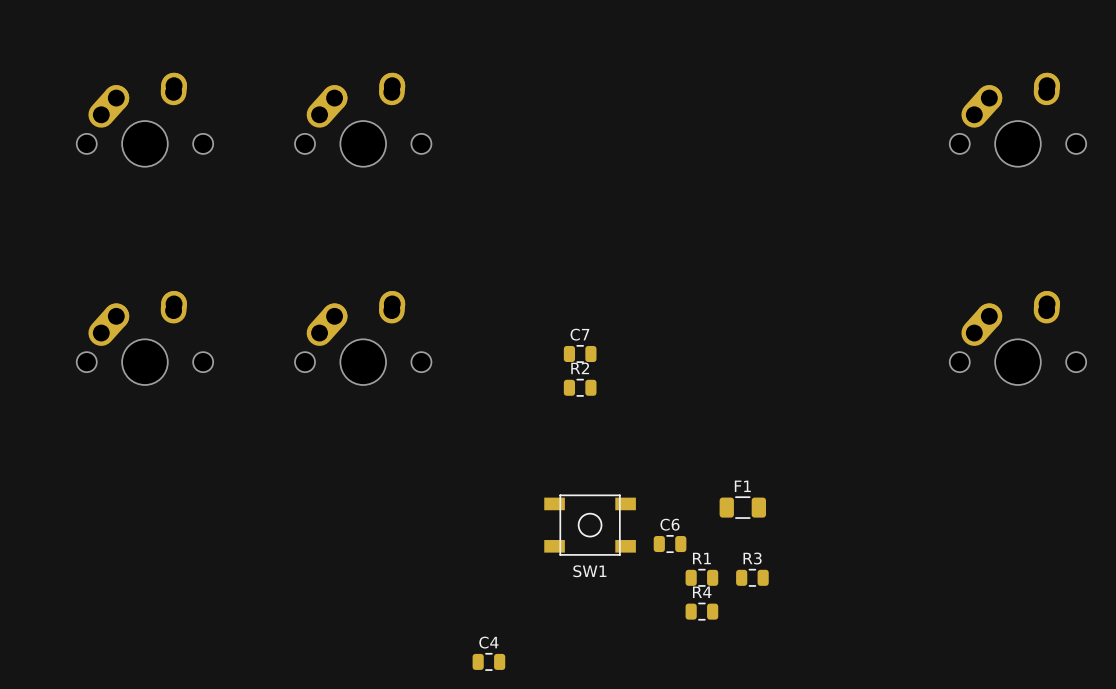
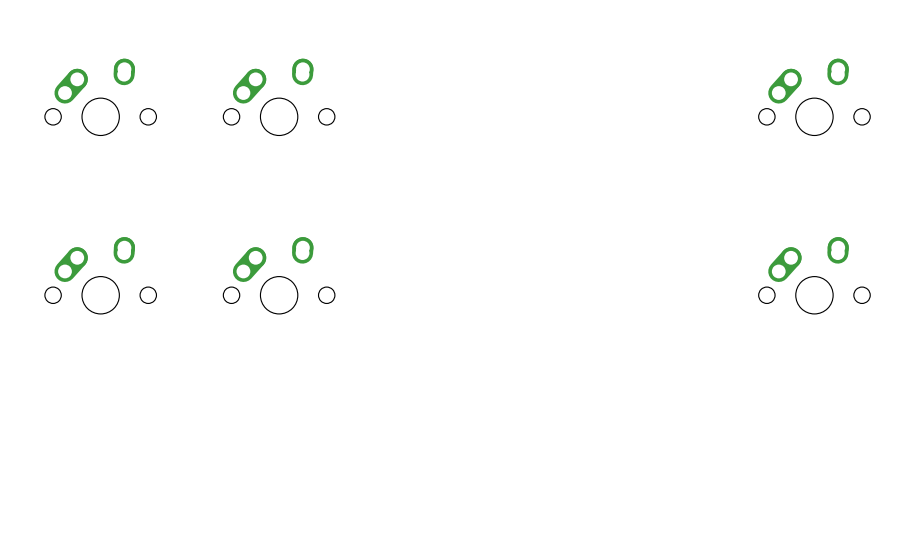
C7: (580, 353) -> none
R2: (580, 387) -> none
F1: (742, 507) -> none
SW1: (590, 525) -> none
C6: (670, 544) -> none
R1: (701, 577) -> none
R3: (752, 577) -> none
R4: (701, 611) -> none
C4: (488, 661) -> none

